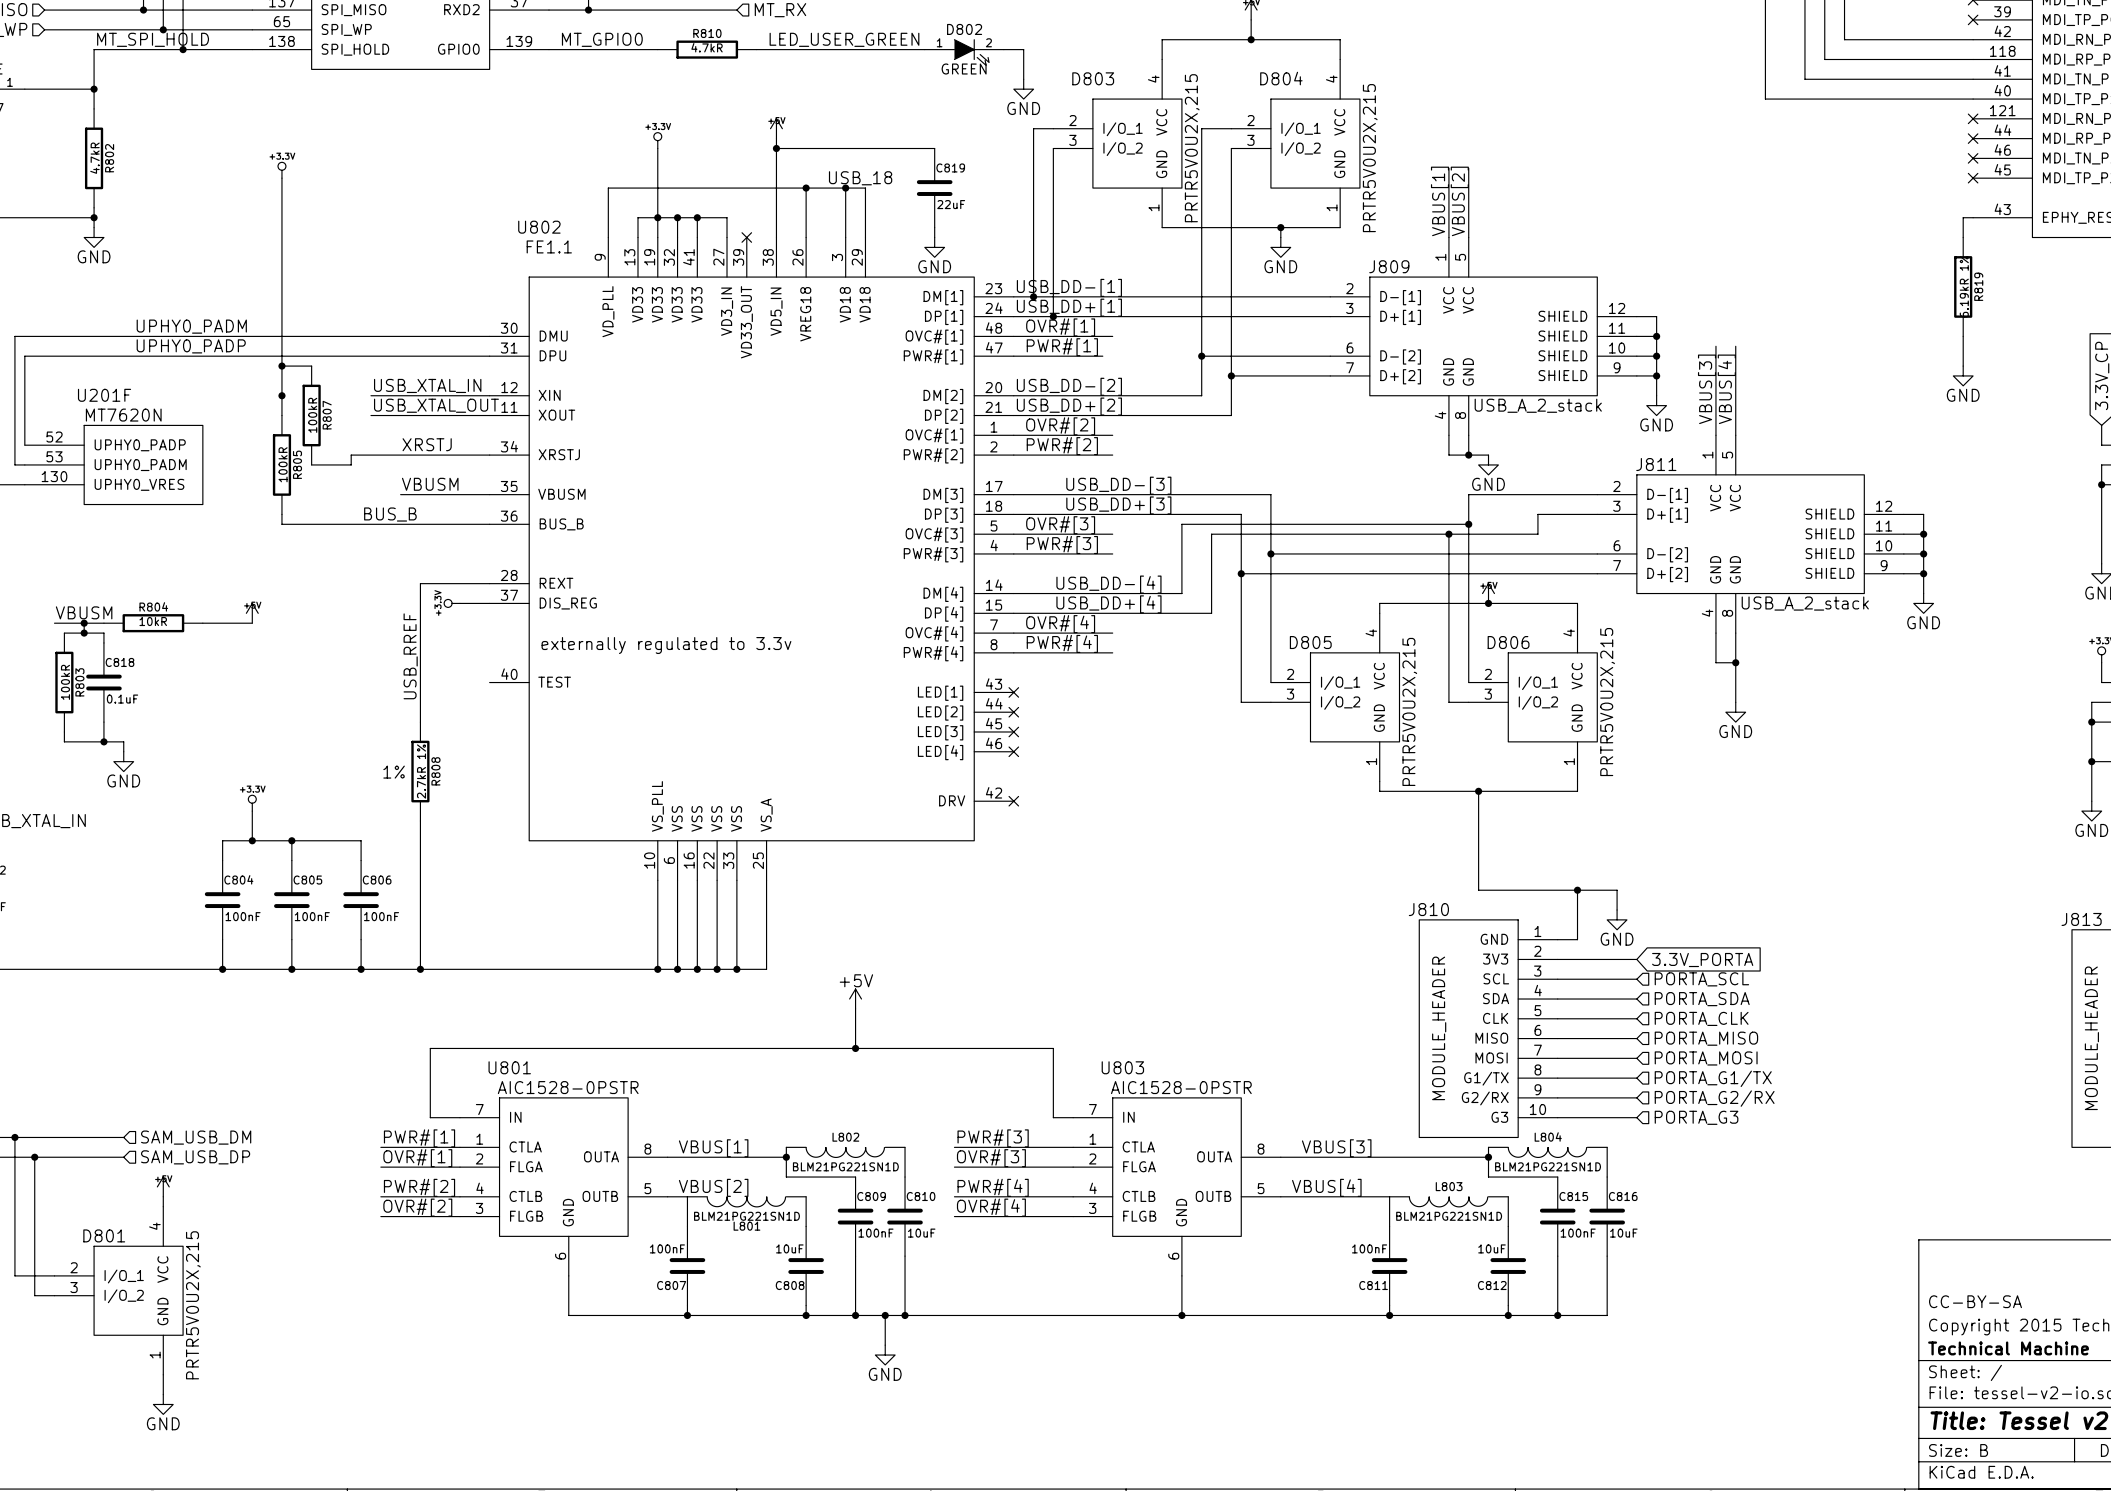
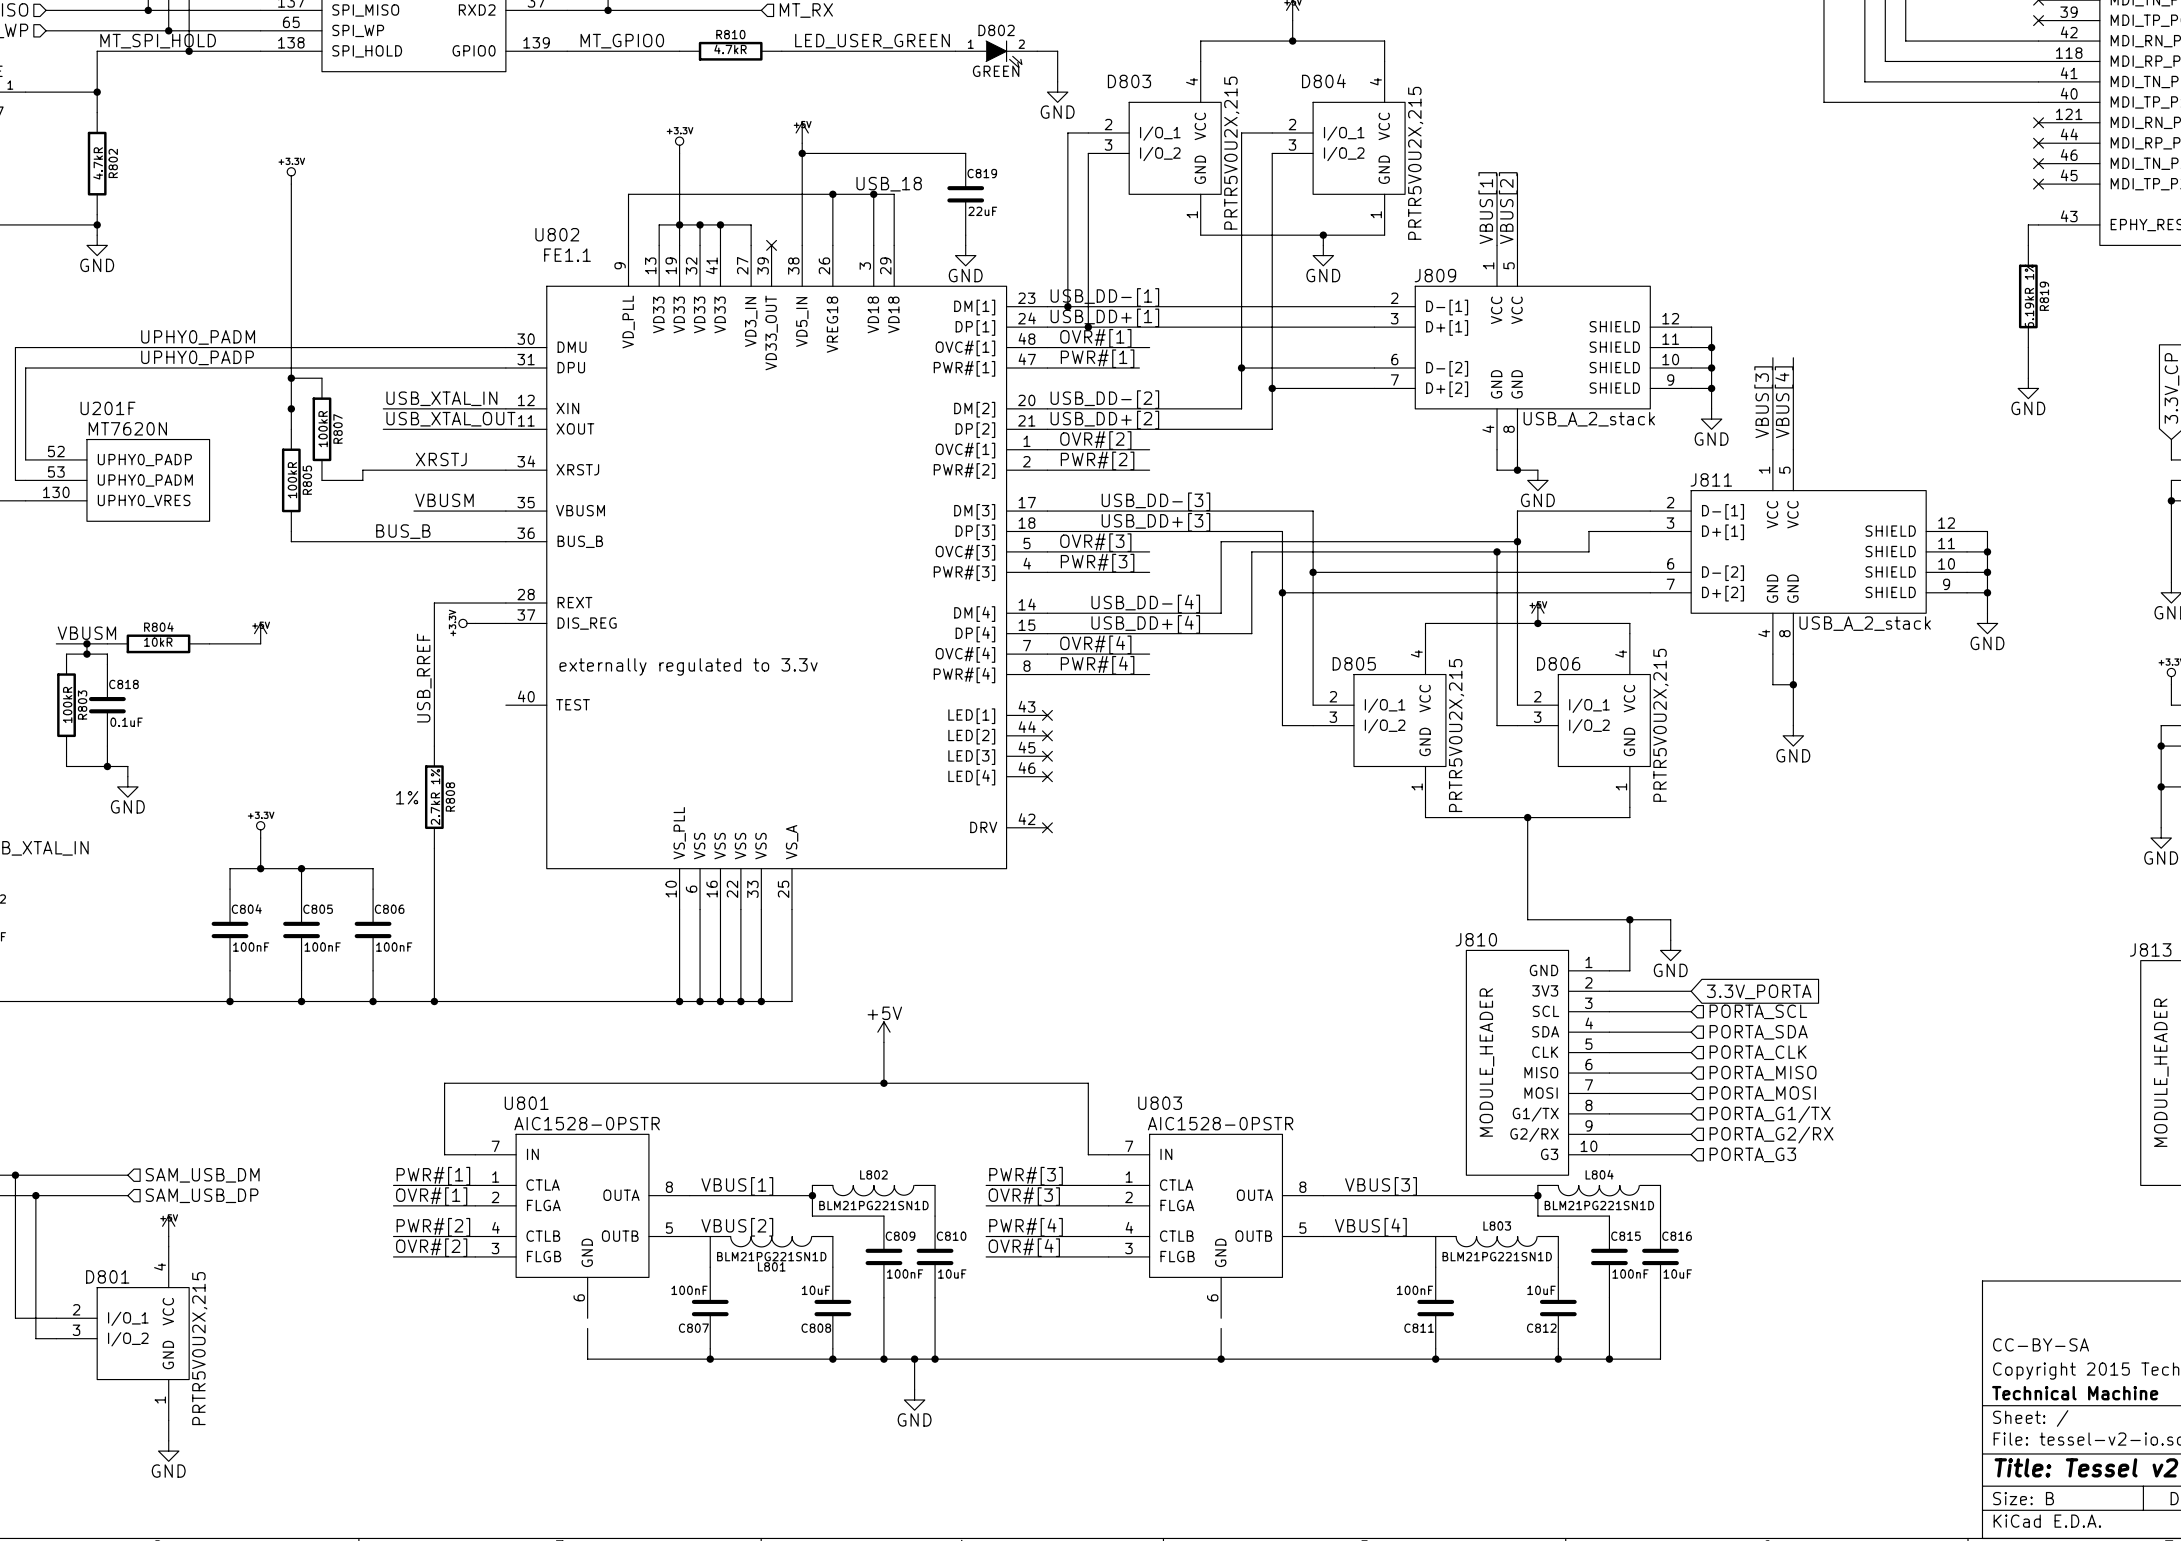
wire: (568, 1275) (568, 1285) -> none
wire: (1181, 1275) (1181, 1285) -> none

